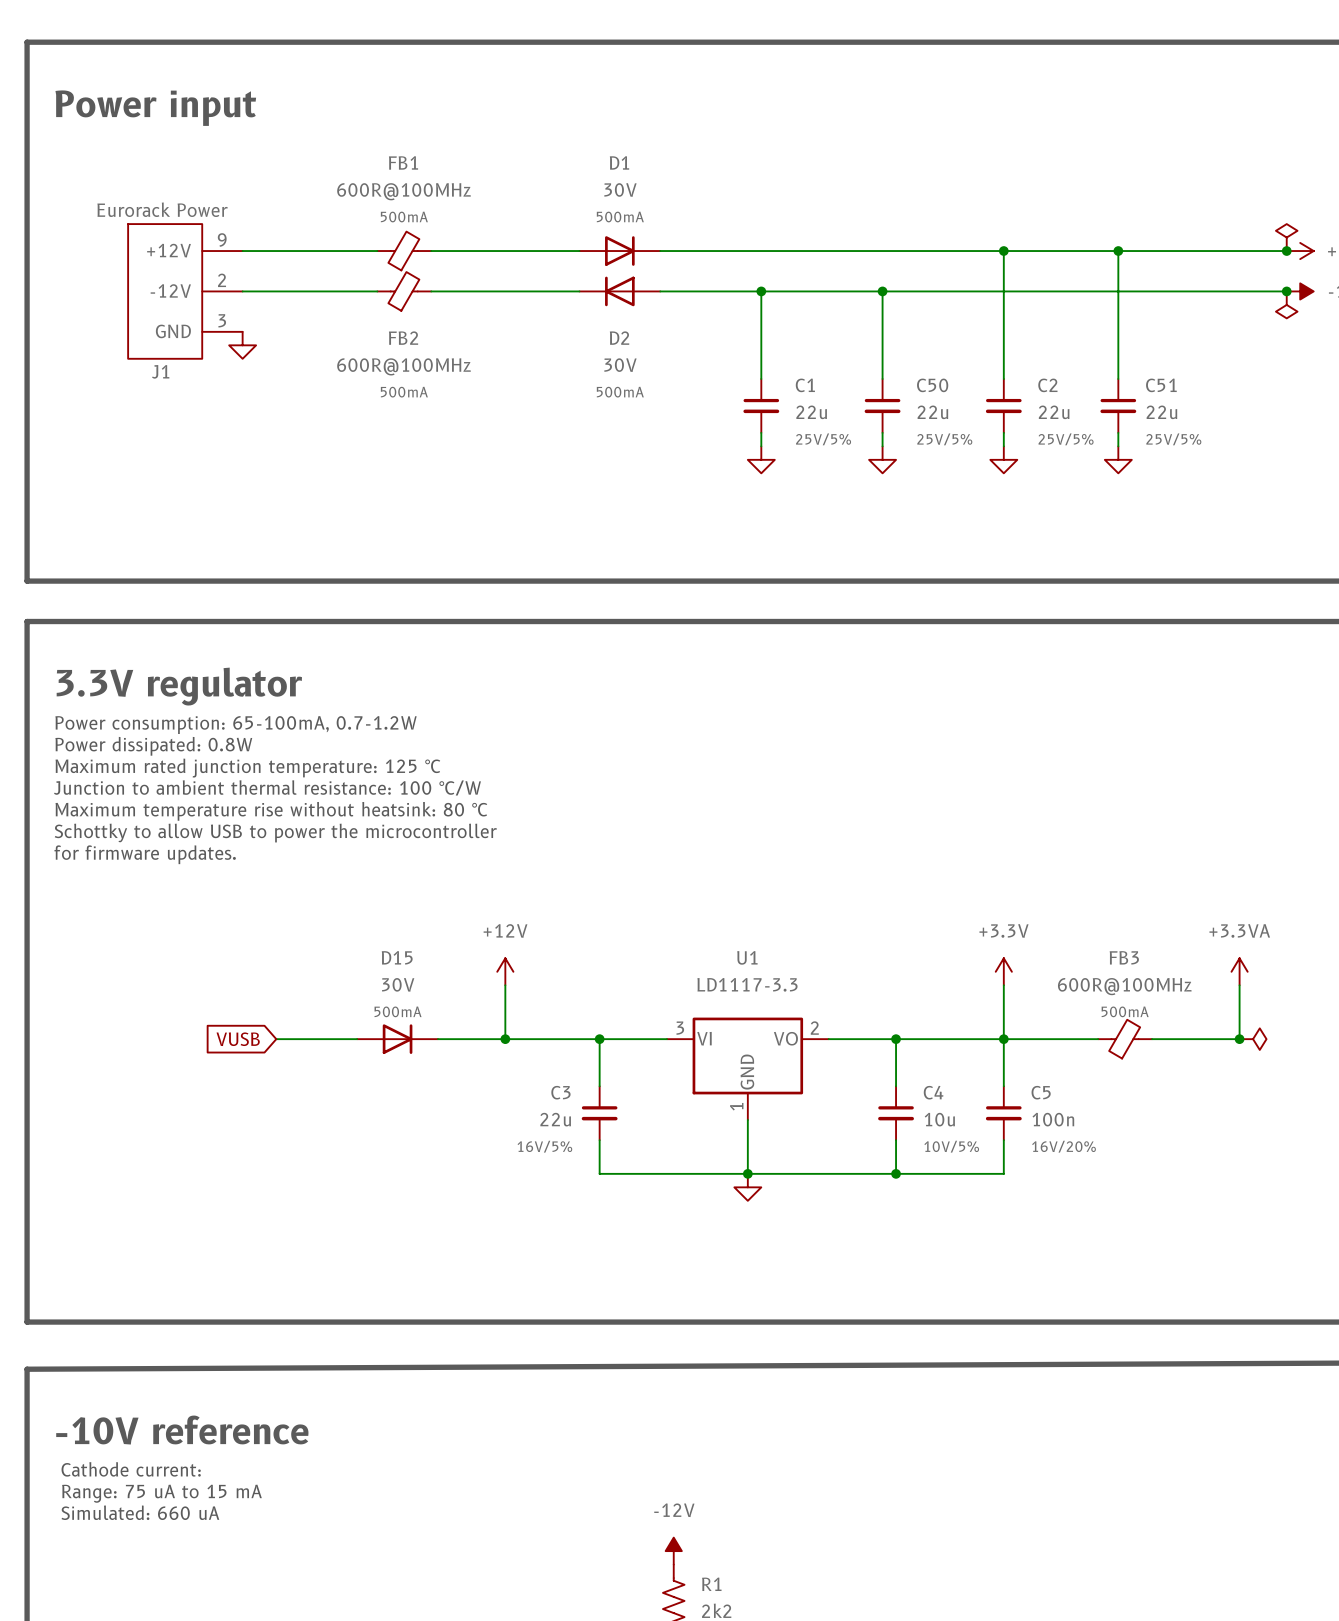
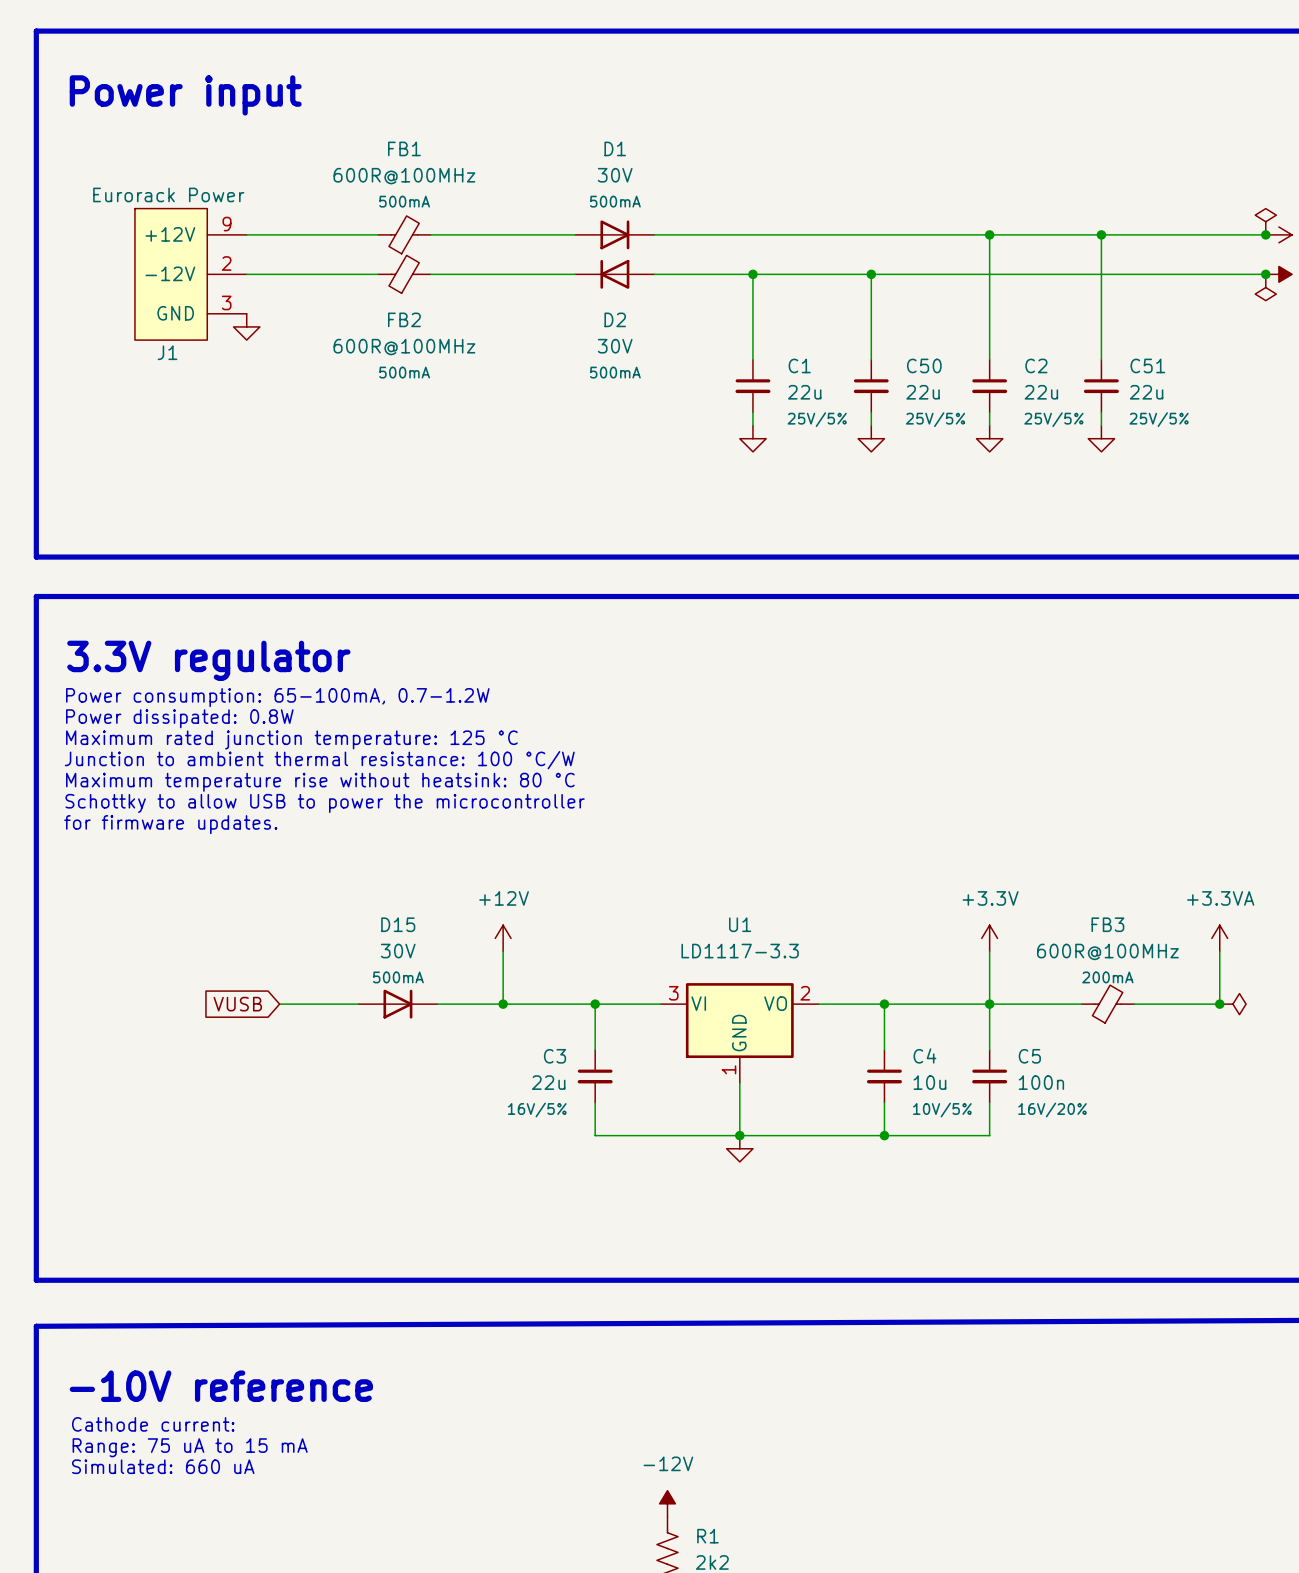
FB3 text: 500mA (1125, 1011) -> 200mA (1107, 977)

